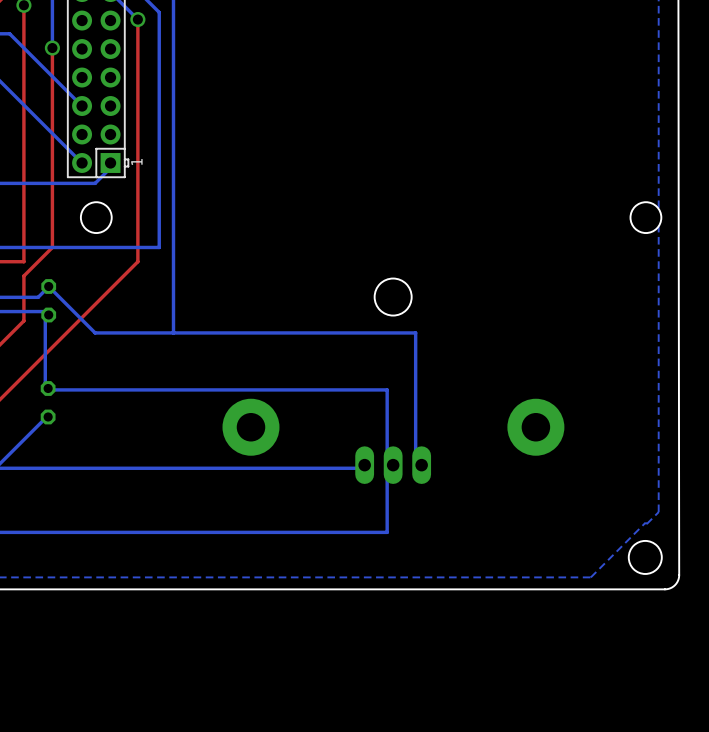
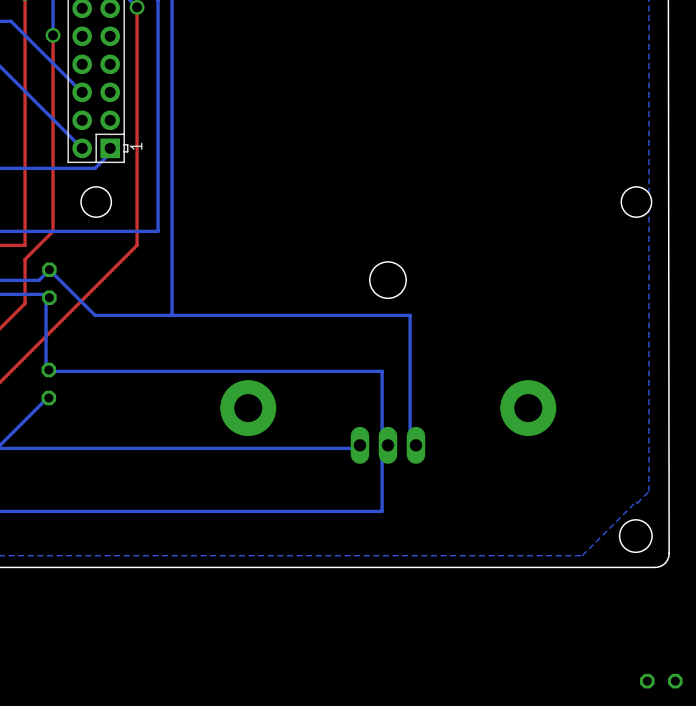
part: none -> (661, 681)

